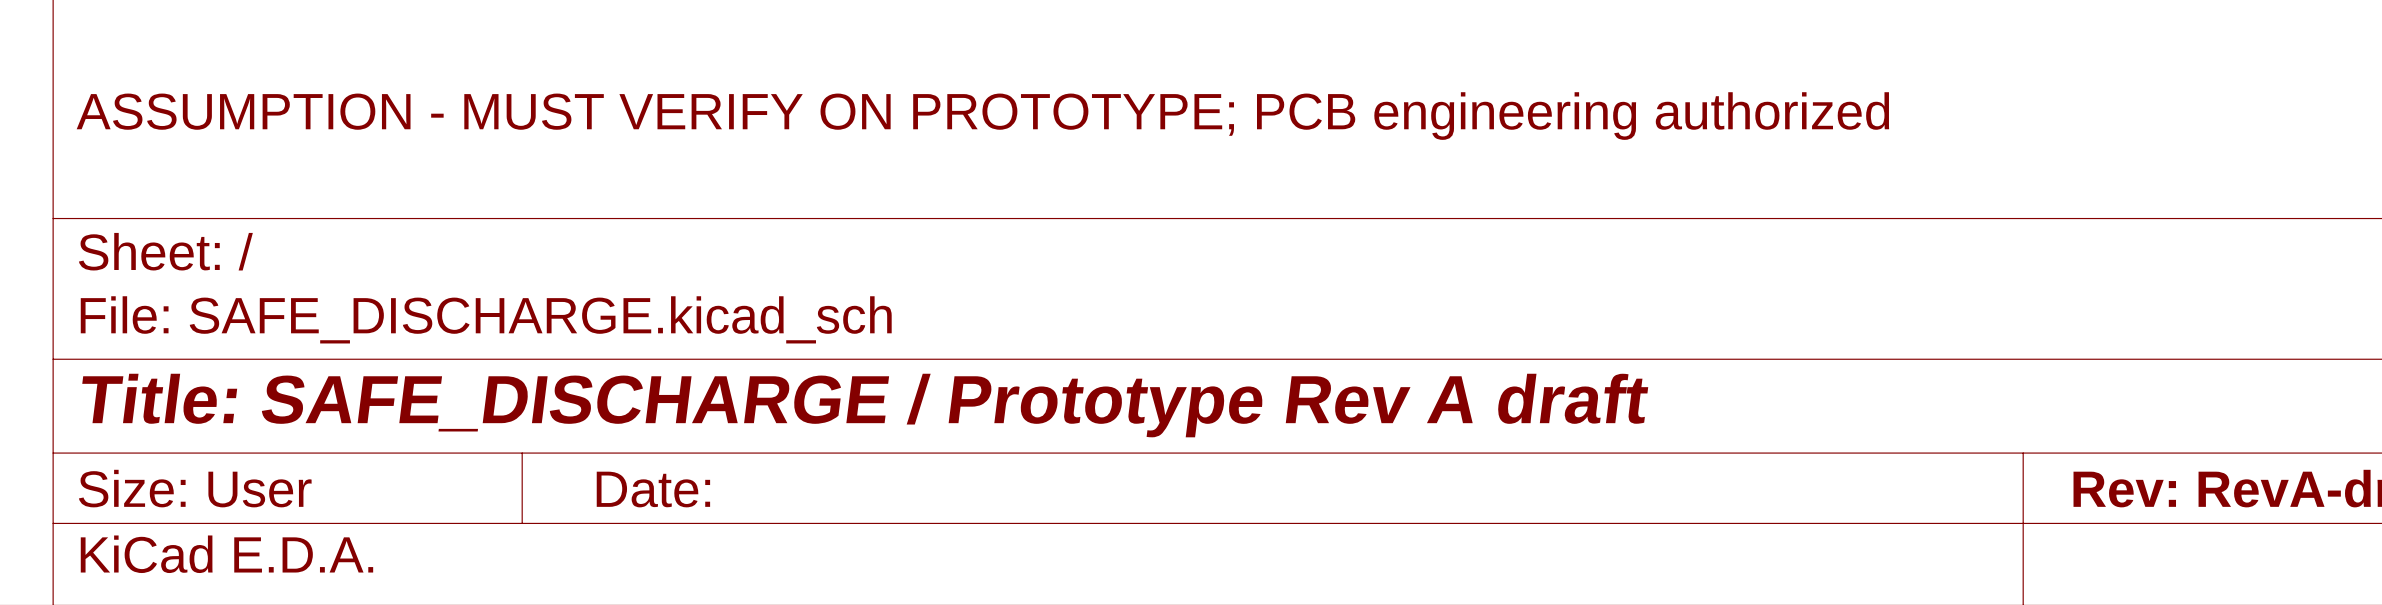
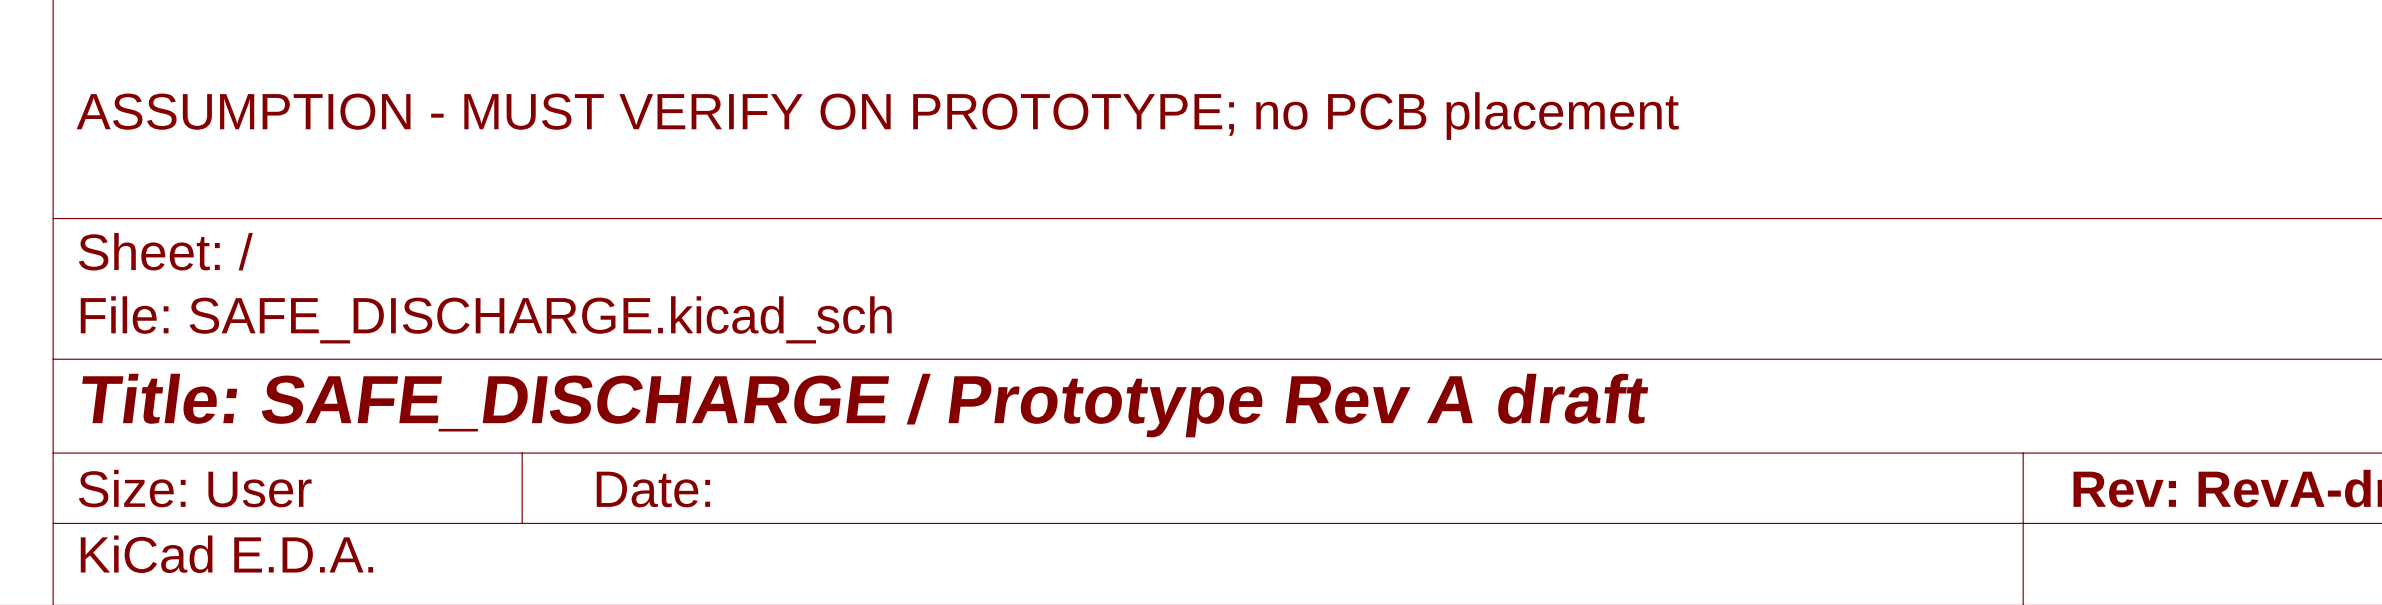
title block: ASSUMPTION - MUST VERIFY ON PROTOTYPE; PCB engineering authorized (982, 116) -> ASSUMPTION - MUST VERIFY ON PROTOTYPE; no PCB placement (877, 116)

